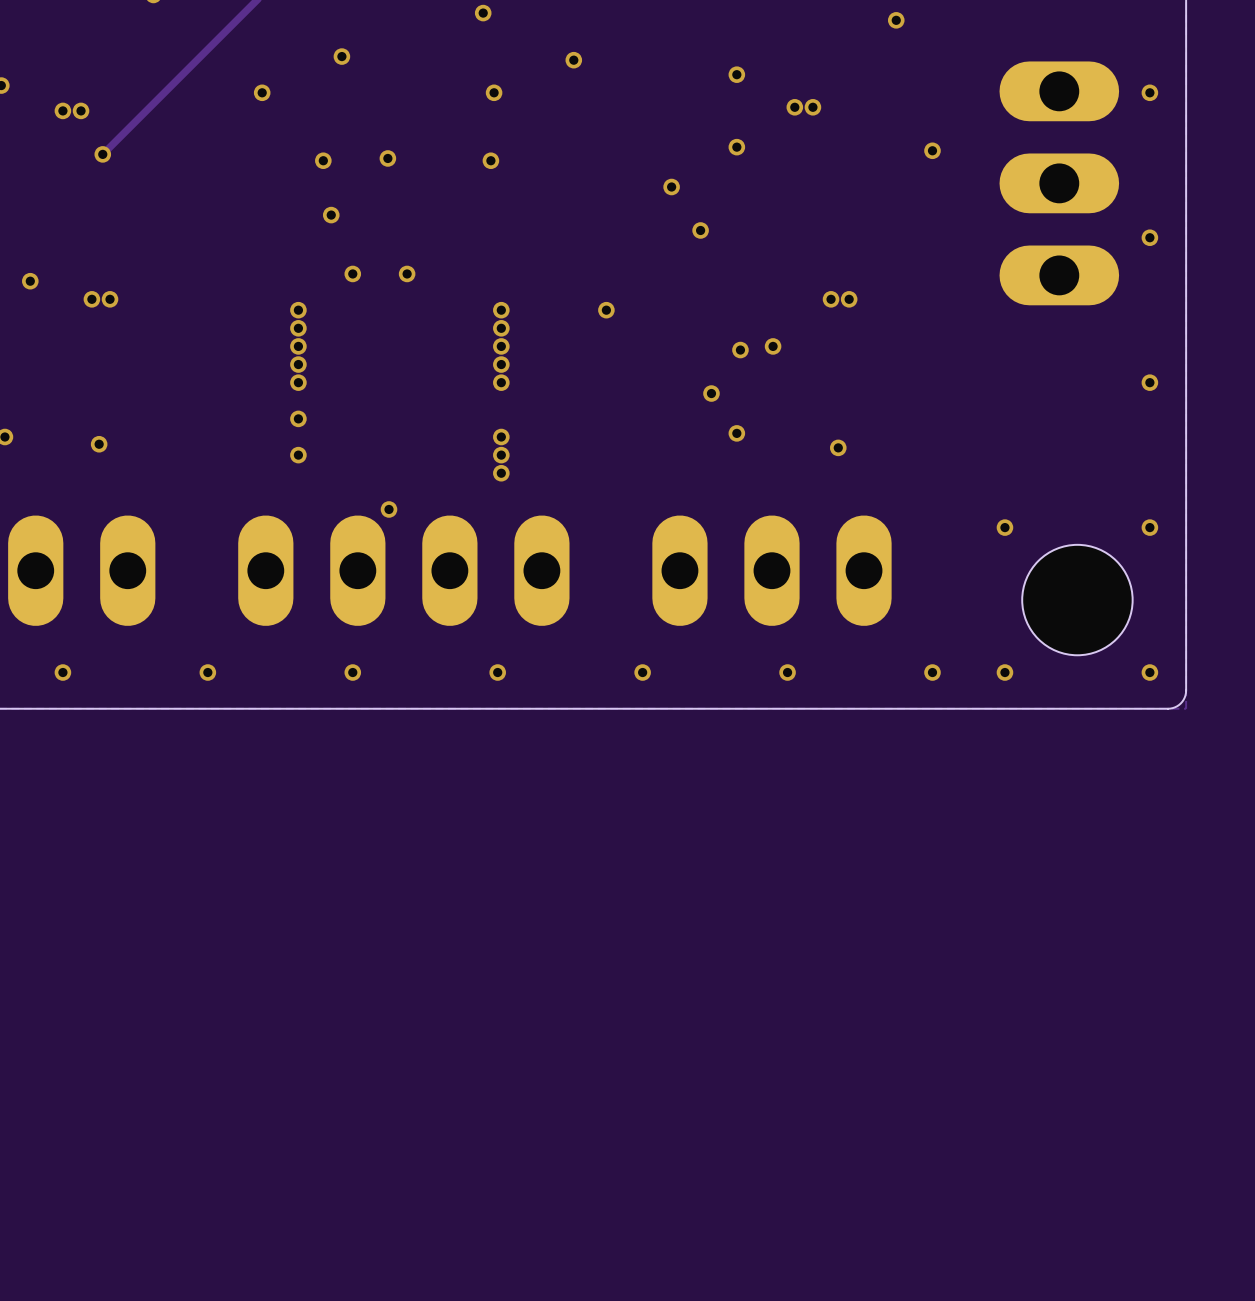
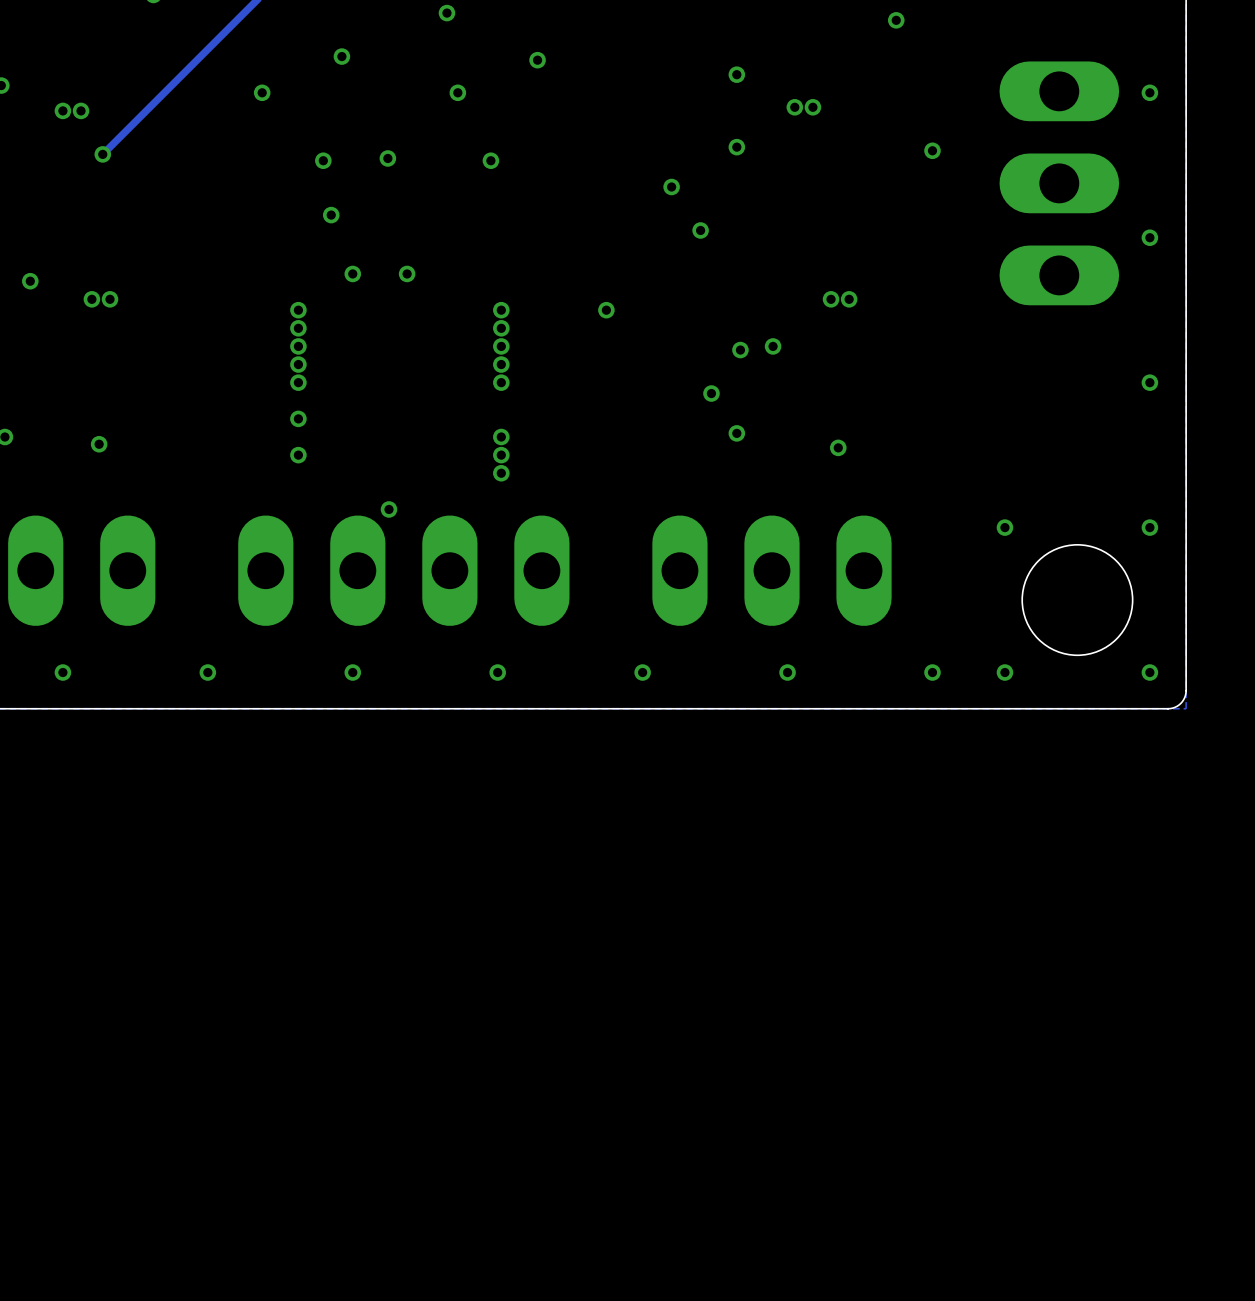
via: none -> (446, 13)
via: (483, 13) -> none
via: none -> (537, 60)
via: (573, 60) -> none
via: none -> (457, 92)
via: (494, 92) -> none

